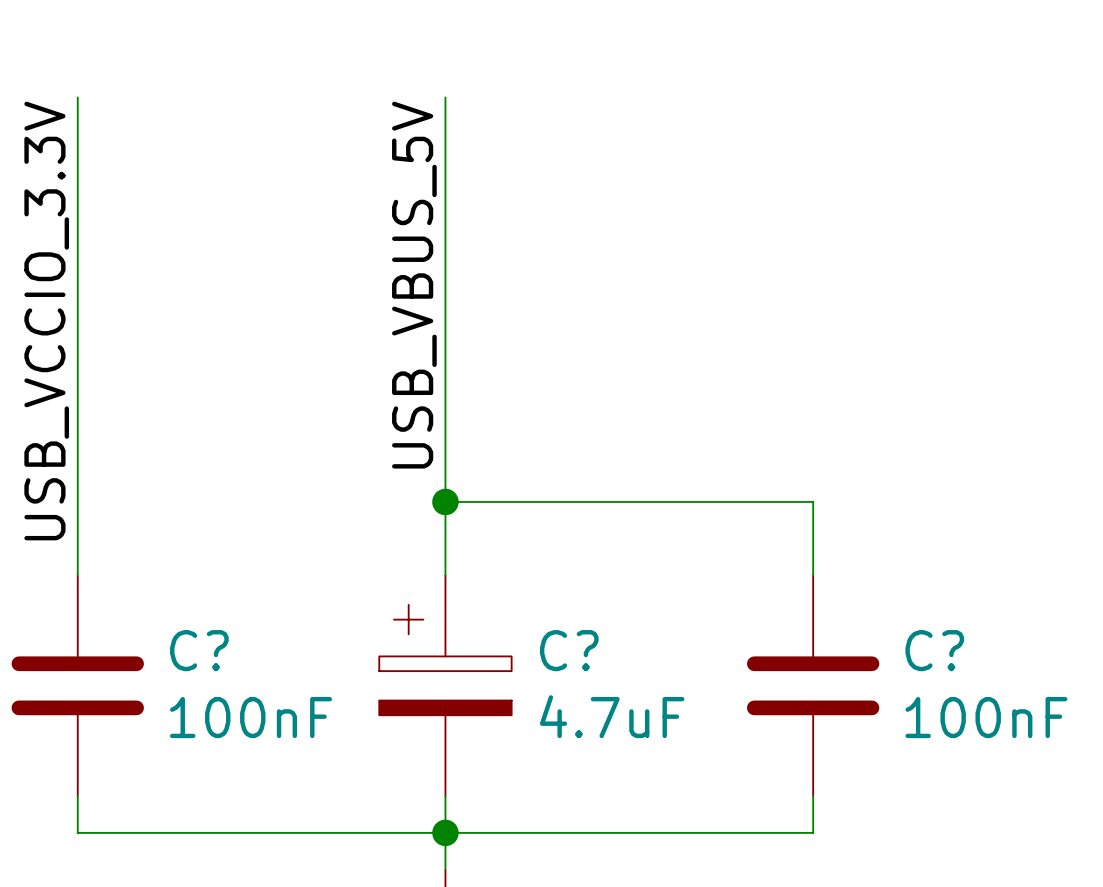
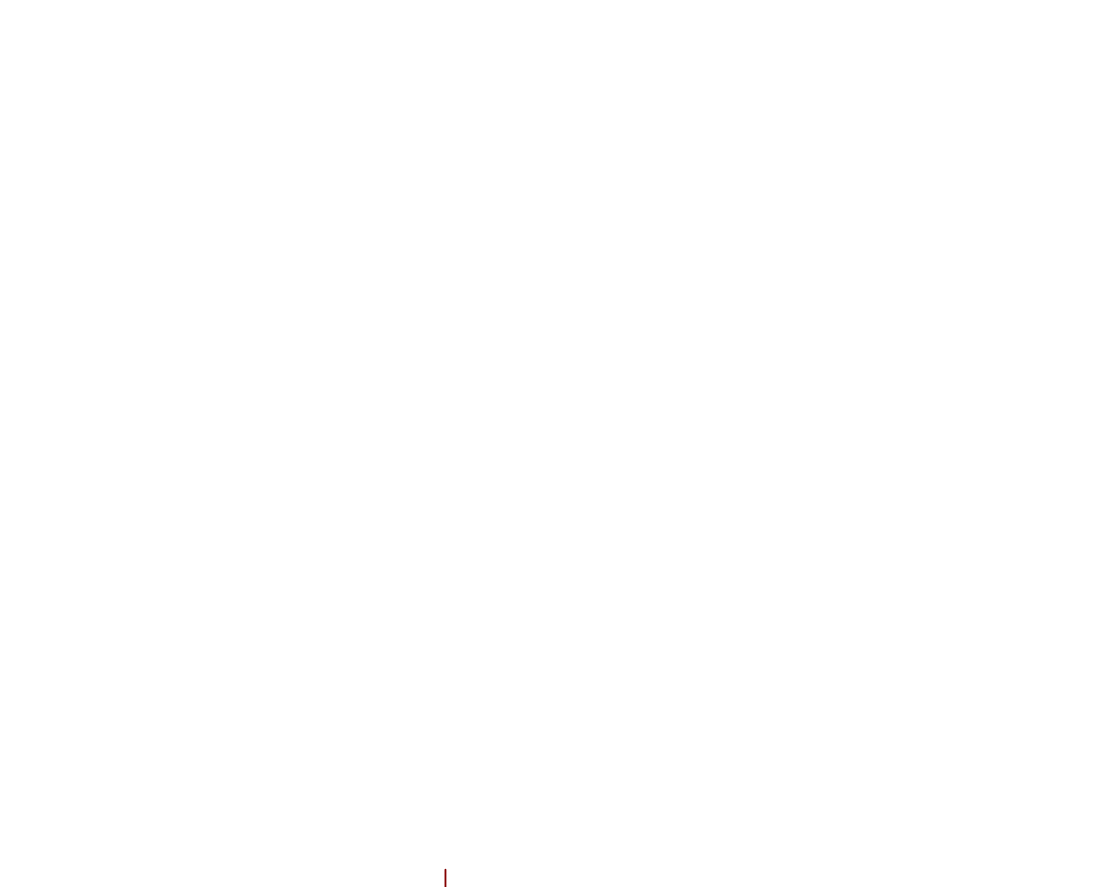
wire: (77, 97) (77, 575) -> none
wire: (445, 97) (445, 575) -> none
label: USB_VBUS_5V (414, 285) -> none
label: USB_VCCIO_3.3V (46, 321) -> none
wire: (445, 501) (813, 501) (813, 575) -> none
junction: (445, 501) -> none
C?: 100nF (77, 685) -> none
C?: 4.7uF (445, 685) -> none
C?: 100nF (813, 685) -> none
wire: (77, 796) (77, 832) (813, 832) (813, 796) -> none
wire: (445, 796) (445, 869) -> none
junction: (445, 832) -> none

